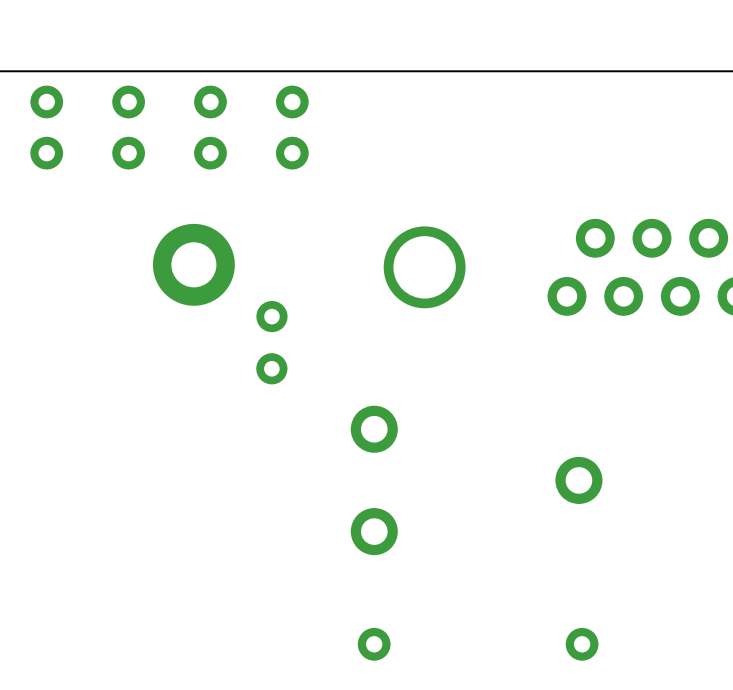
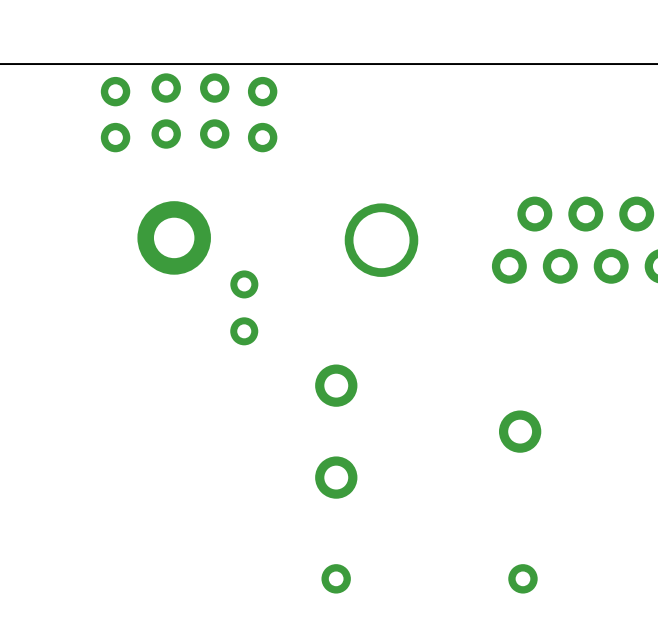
part: none -> (166, 111)
part: none -> (214, 111)
part: (46, 127) -> none
part: (210, 127) -> none

